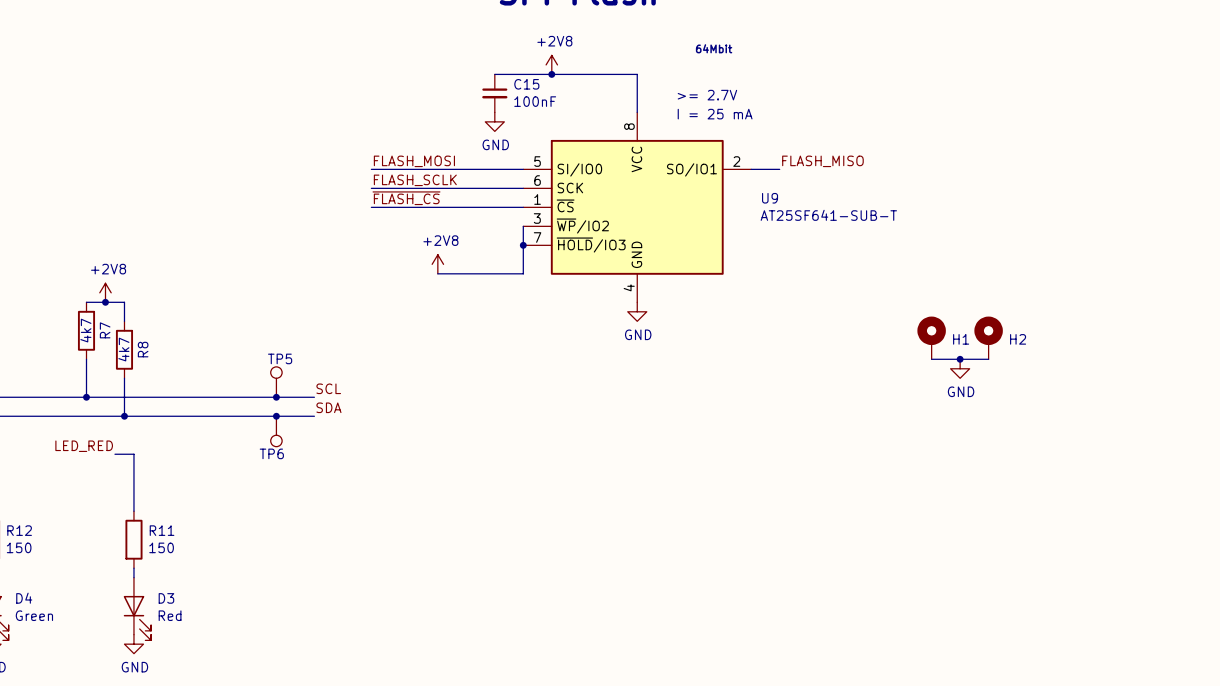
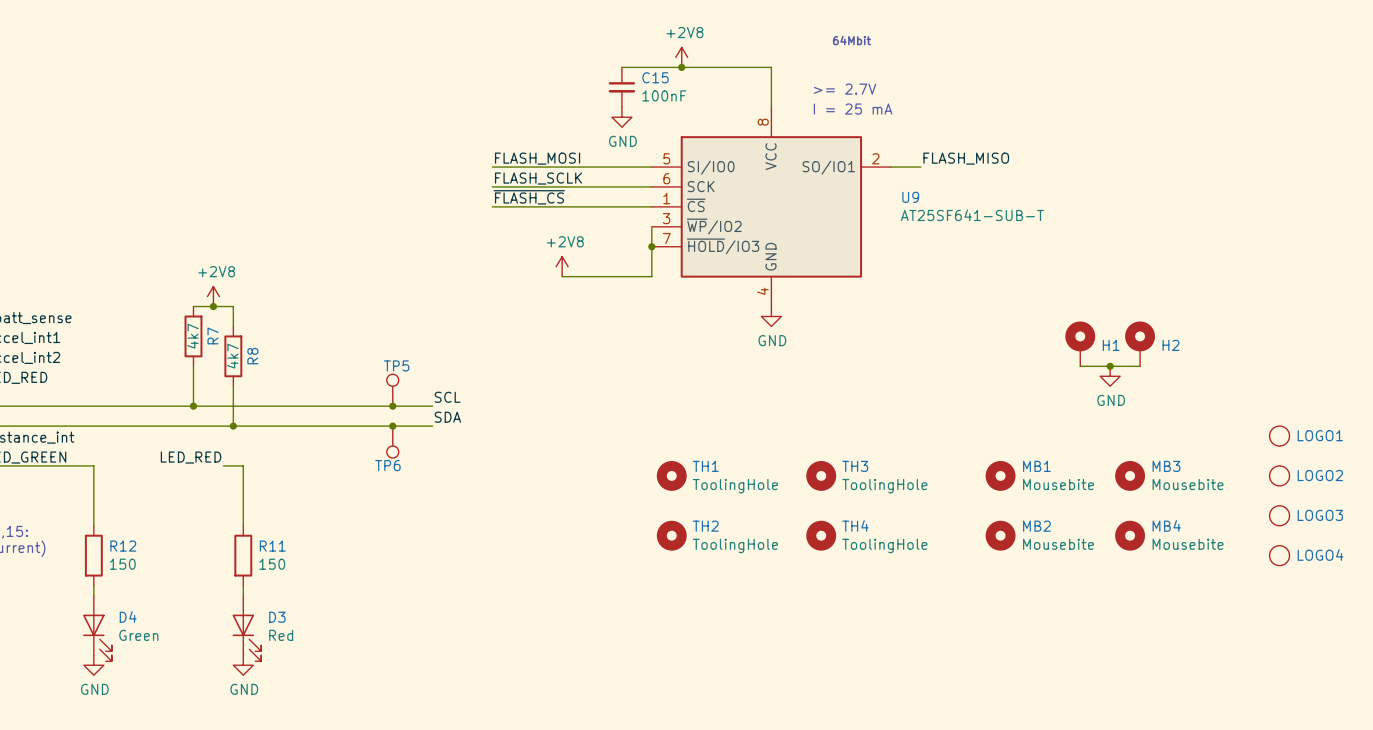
LOGO1: none -> (1279, 436)
TH1: none -> ToolingHole (671, 475)
TH3: none -> ToolingHole (821, 475)
MB1: none -> Mousebite (1000, 475)
MB3: none -> Mousebite (1130, 475)
LOGO2: none -> (1279, 475)
LOGO3: none -> (1279, 515)
TH2: none -> ToolingHole (671, 535)
TH4: none -> ToolingHole (821, 535)
MB2: none -> Mousebite (1000, 535)
MB4: none -> Mousebite (1130, 535)
LOGO4: none -> (1279, 555)

